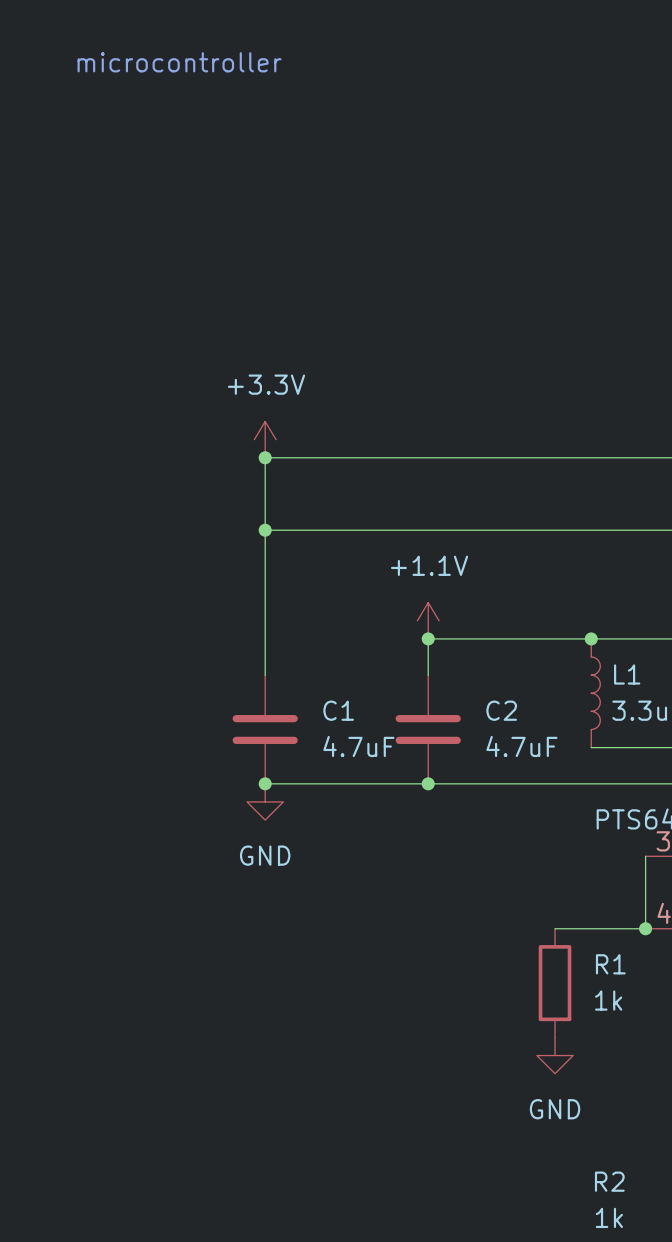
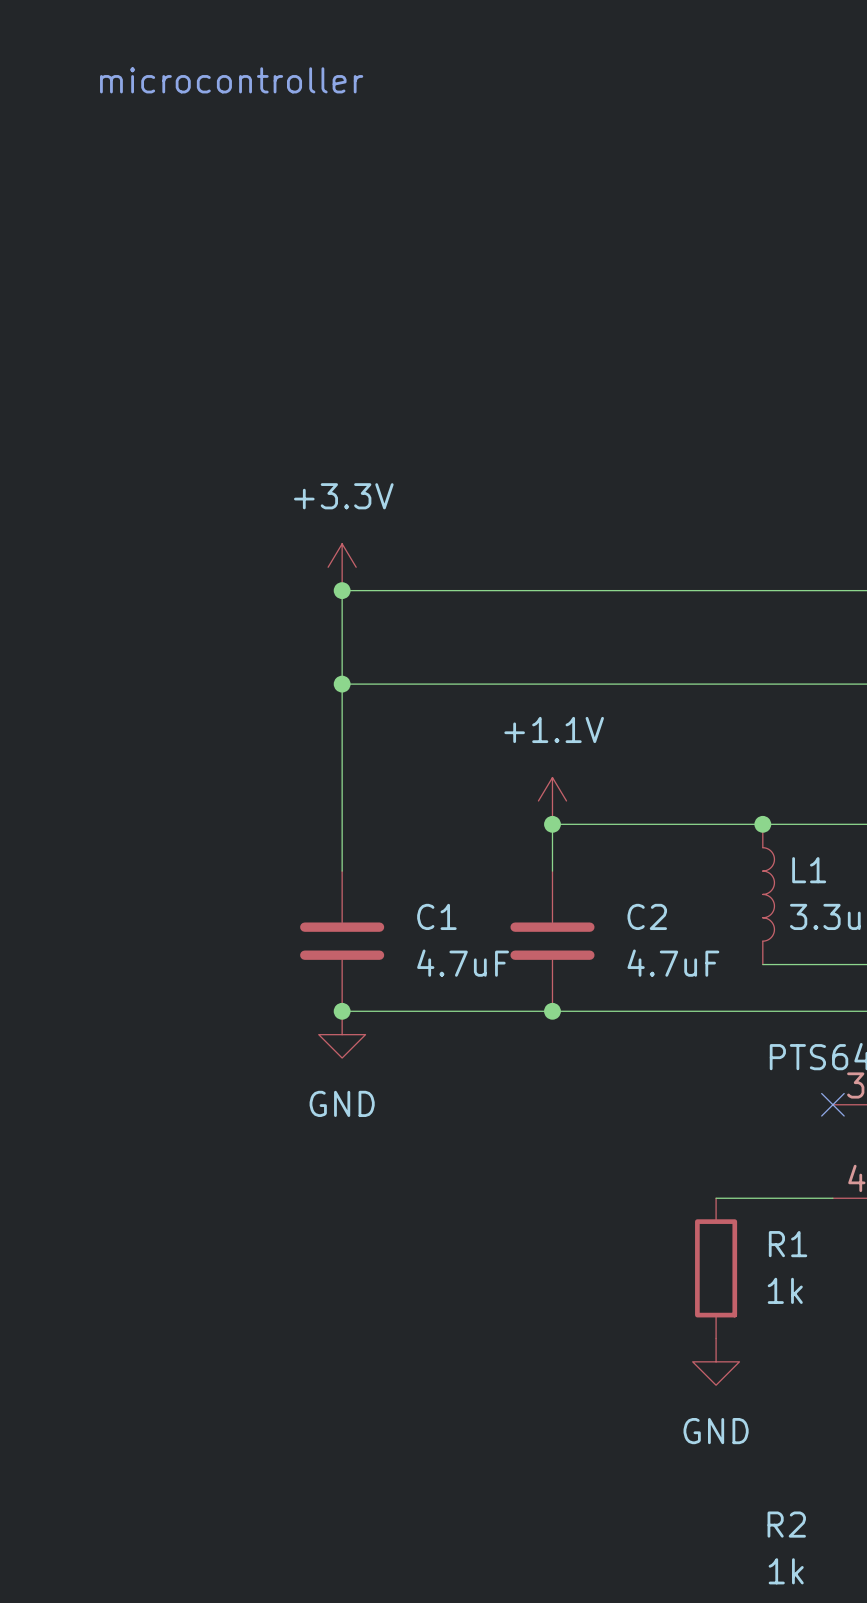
wire: (645, 856) (645, 928) -> none
no-connect mark: none -> (832, 1104)
junction: (645, 928) -> none

